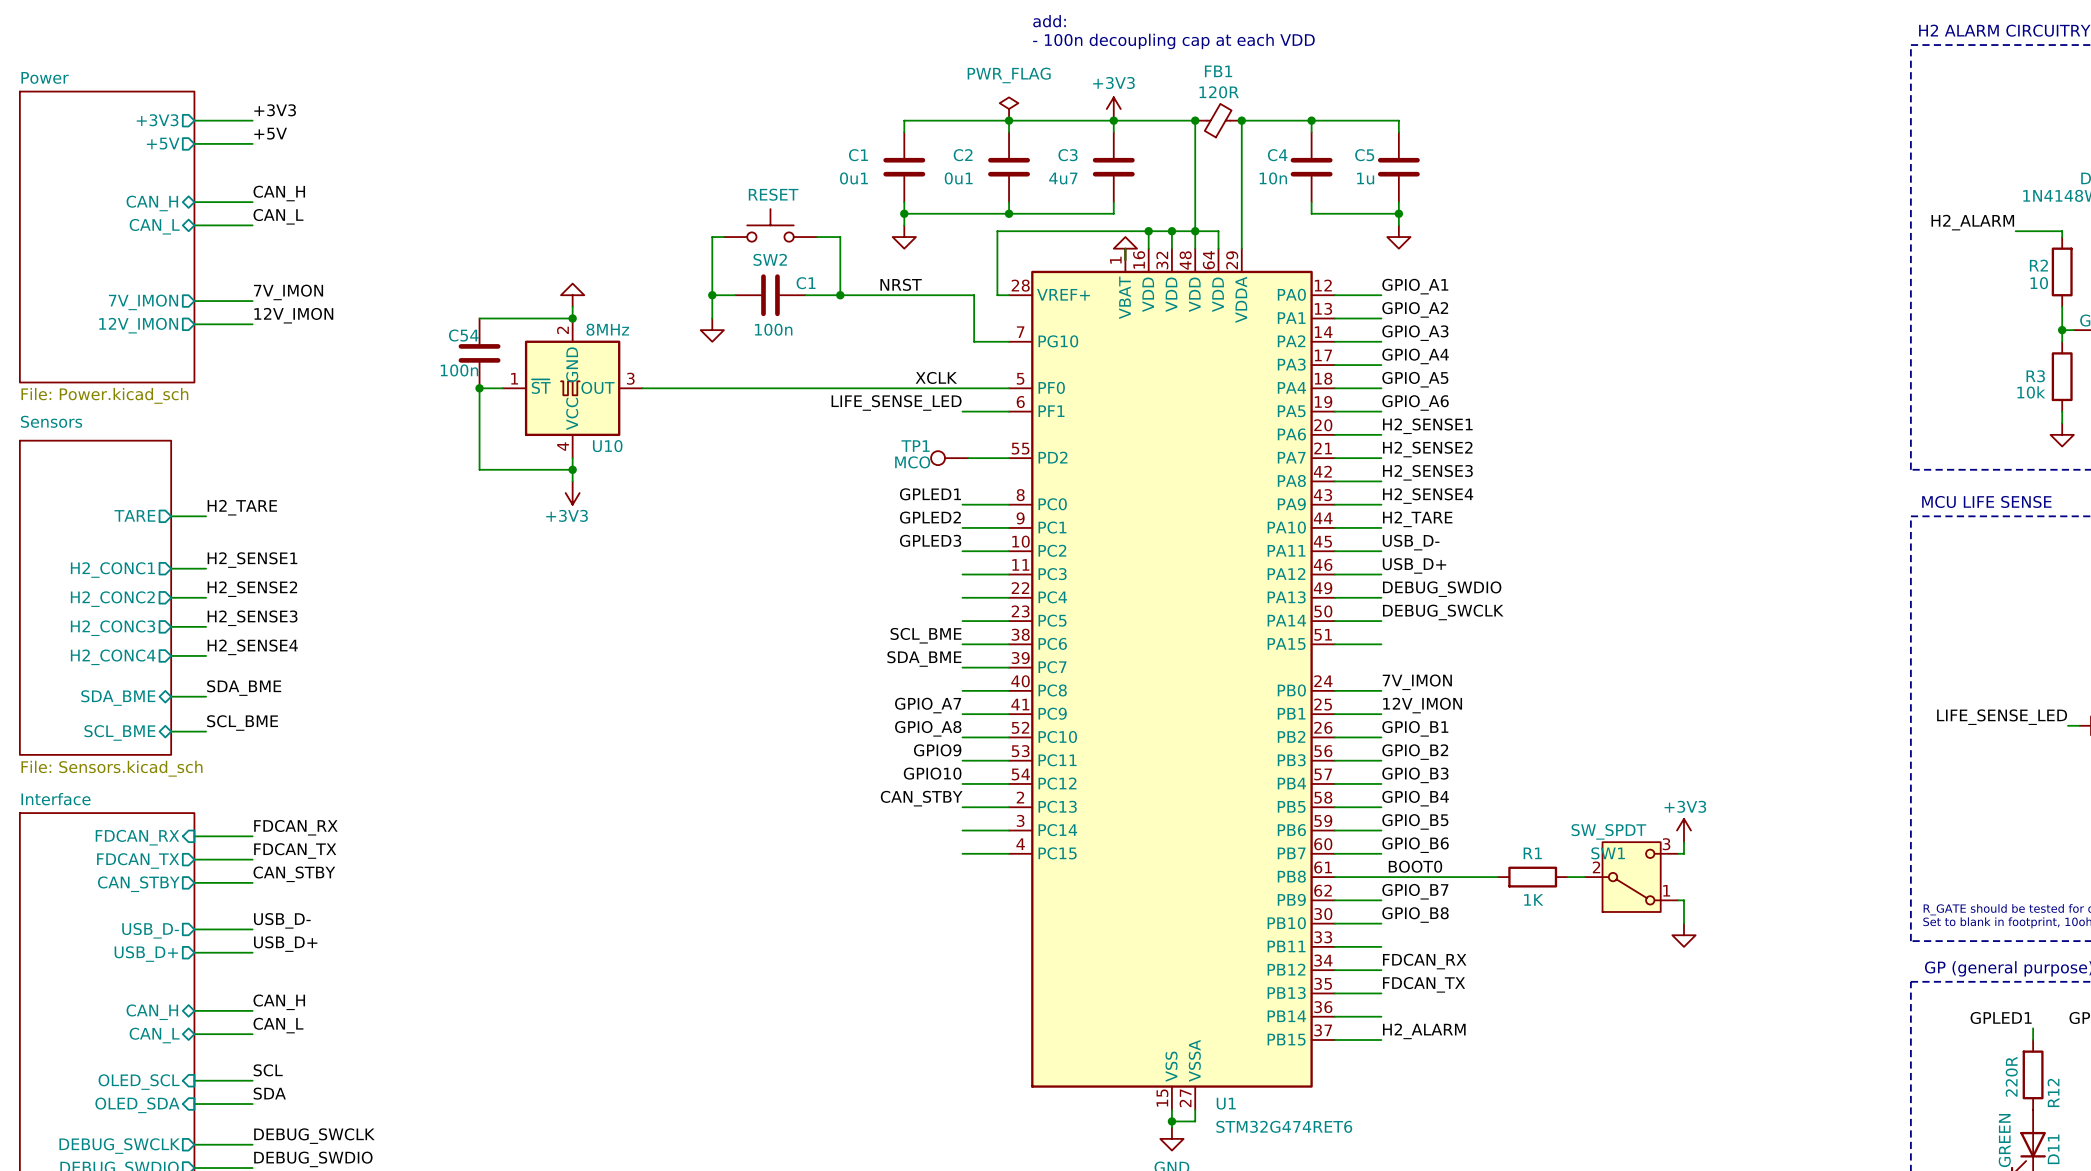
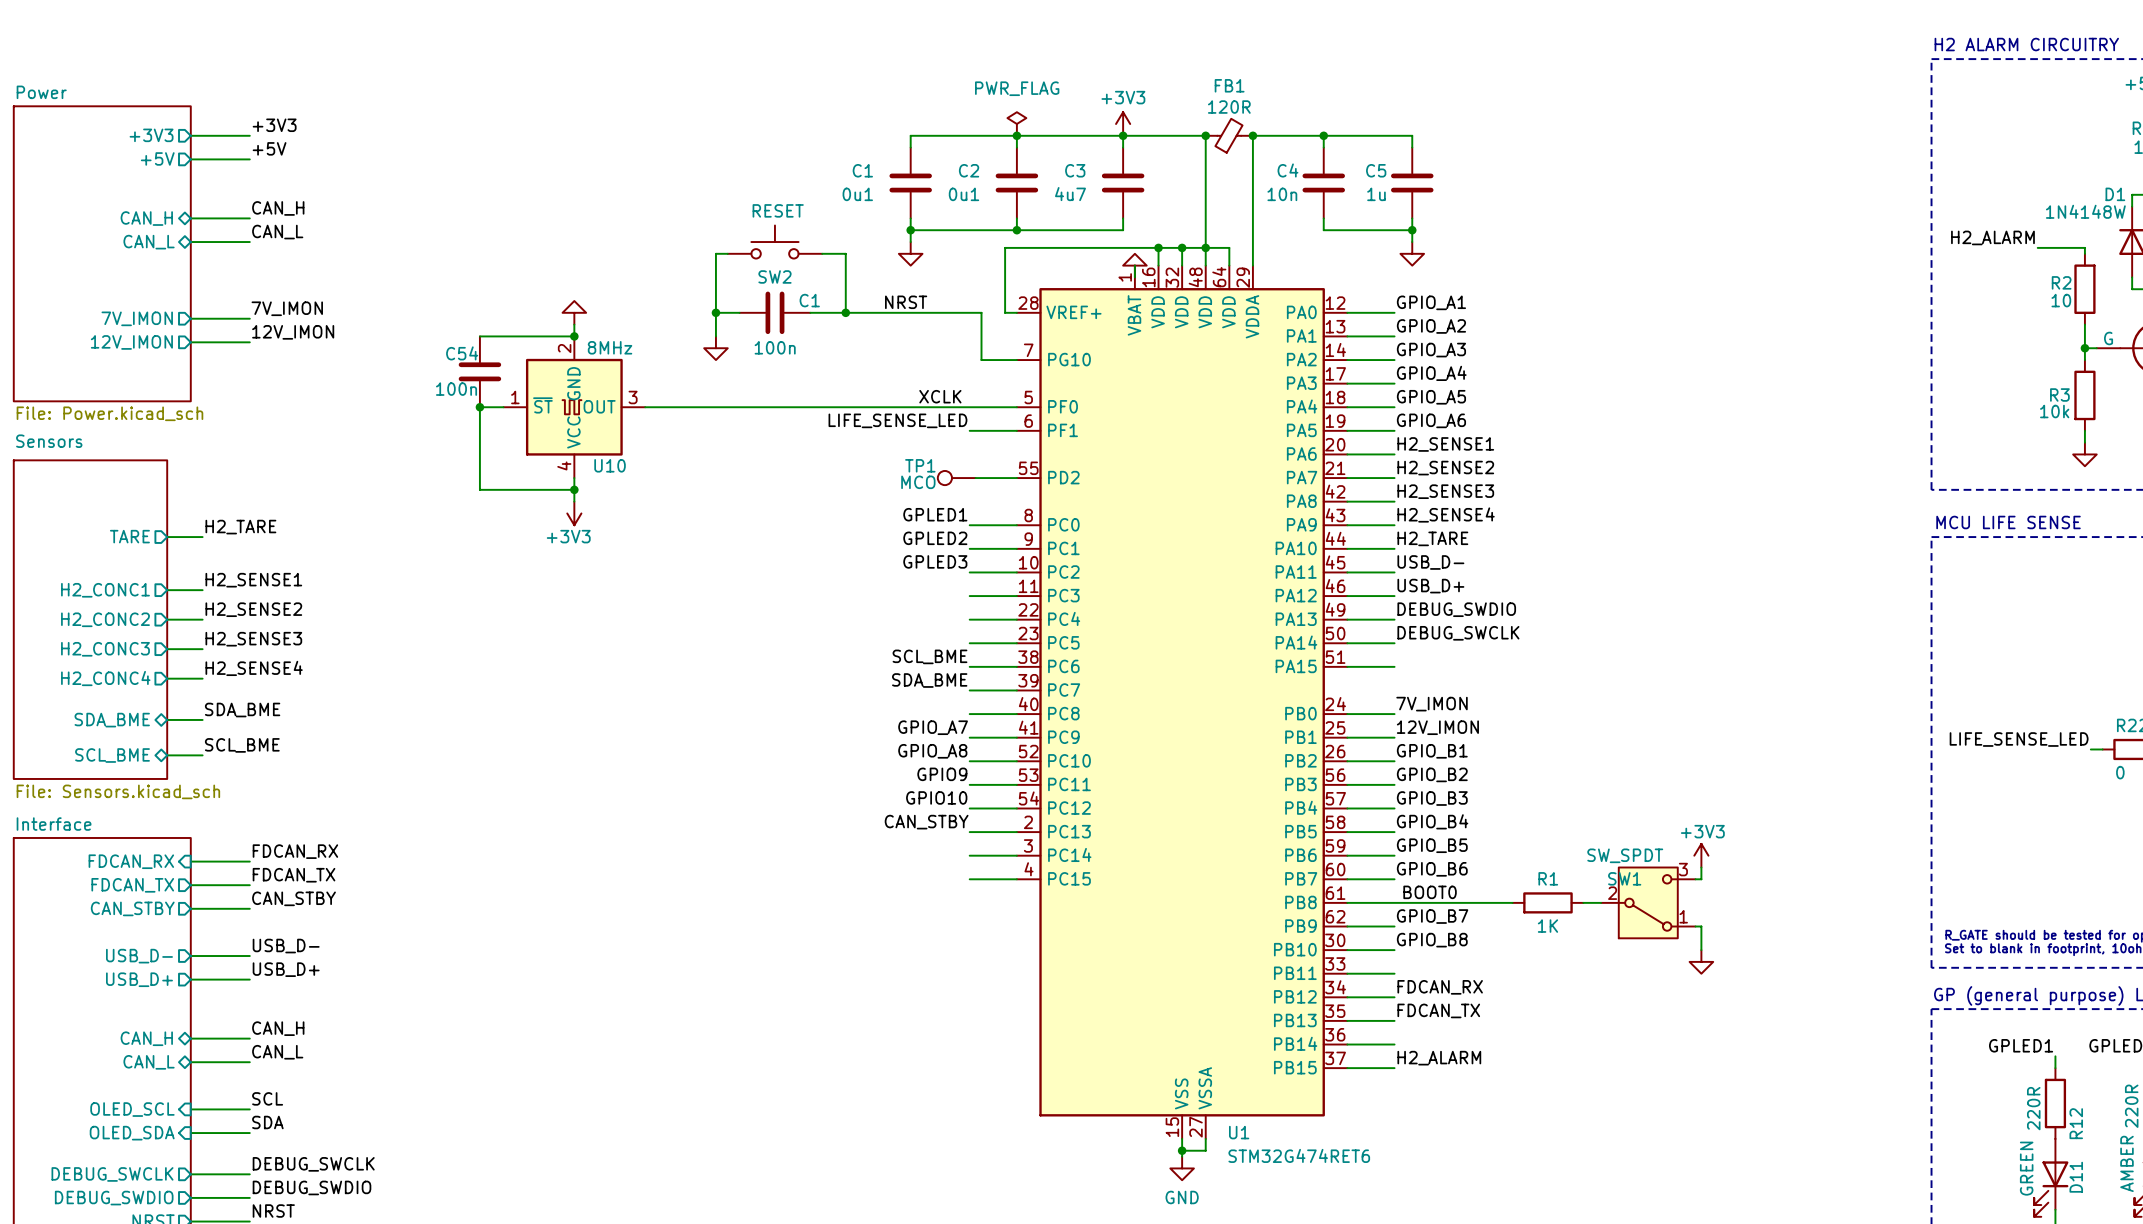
text: add: (1049, 21) -> none
text: - 100n decoupling cap at each VDD (1173, 41) -> none

